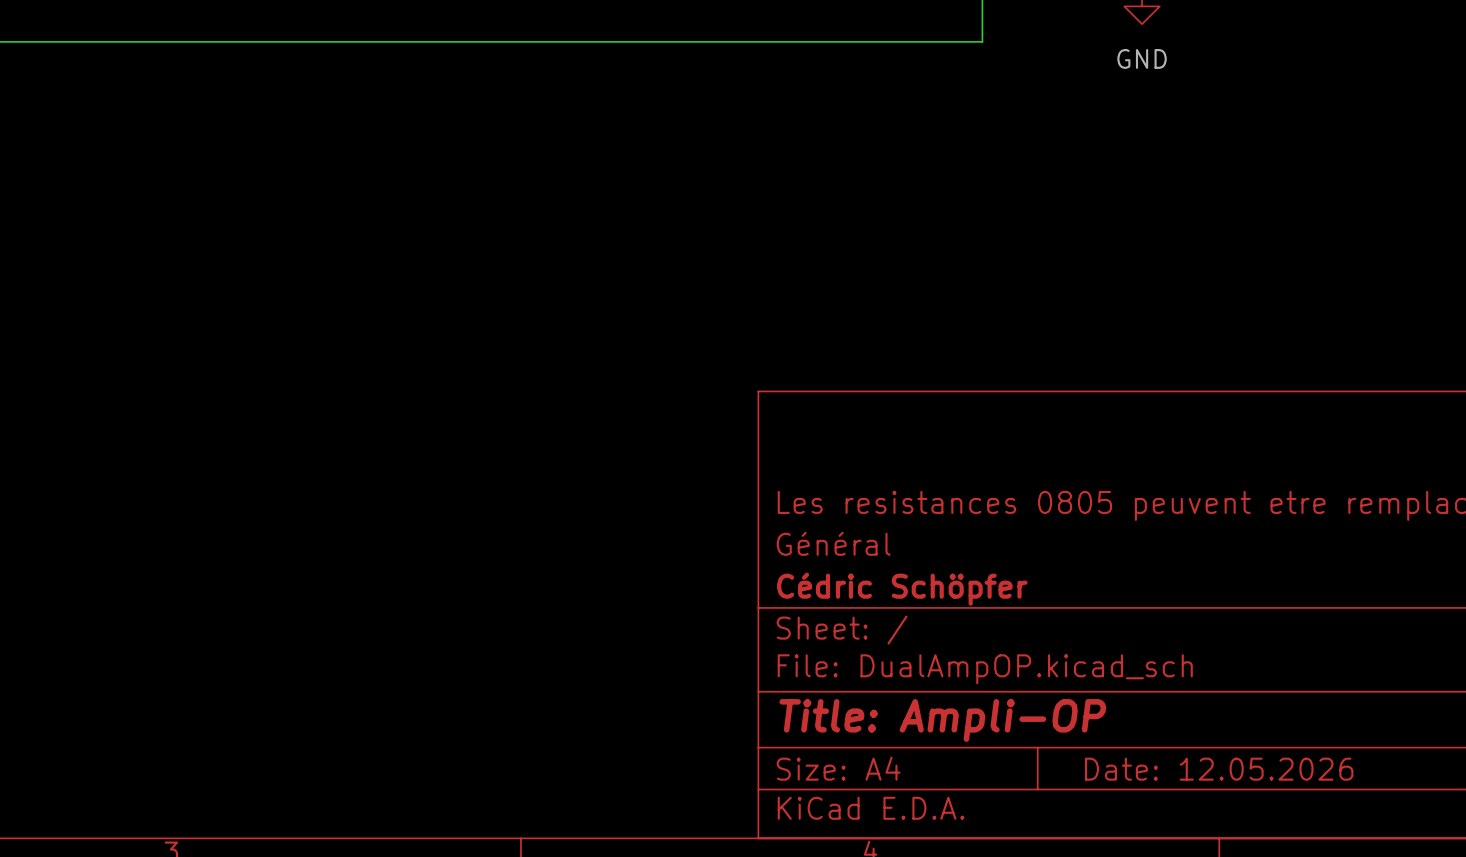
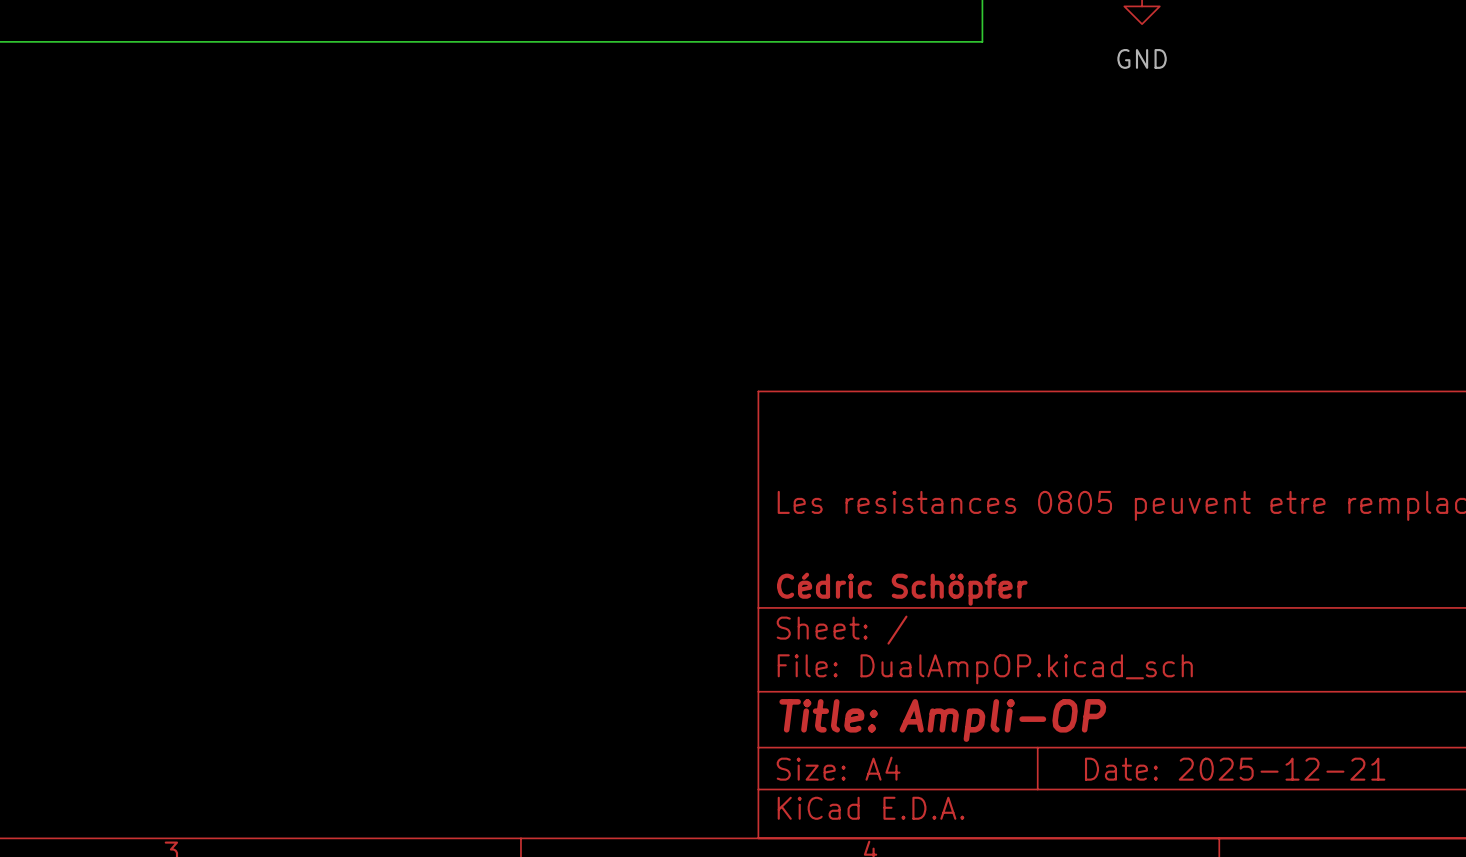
title block: Général (833, 543) -> none
title block: Date: 12.05.2026 (1219, 769) -> Date: 2025-12-21 (1235, 769)

